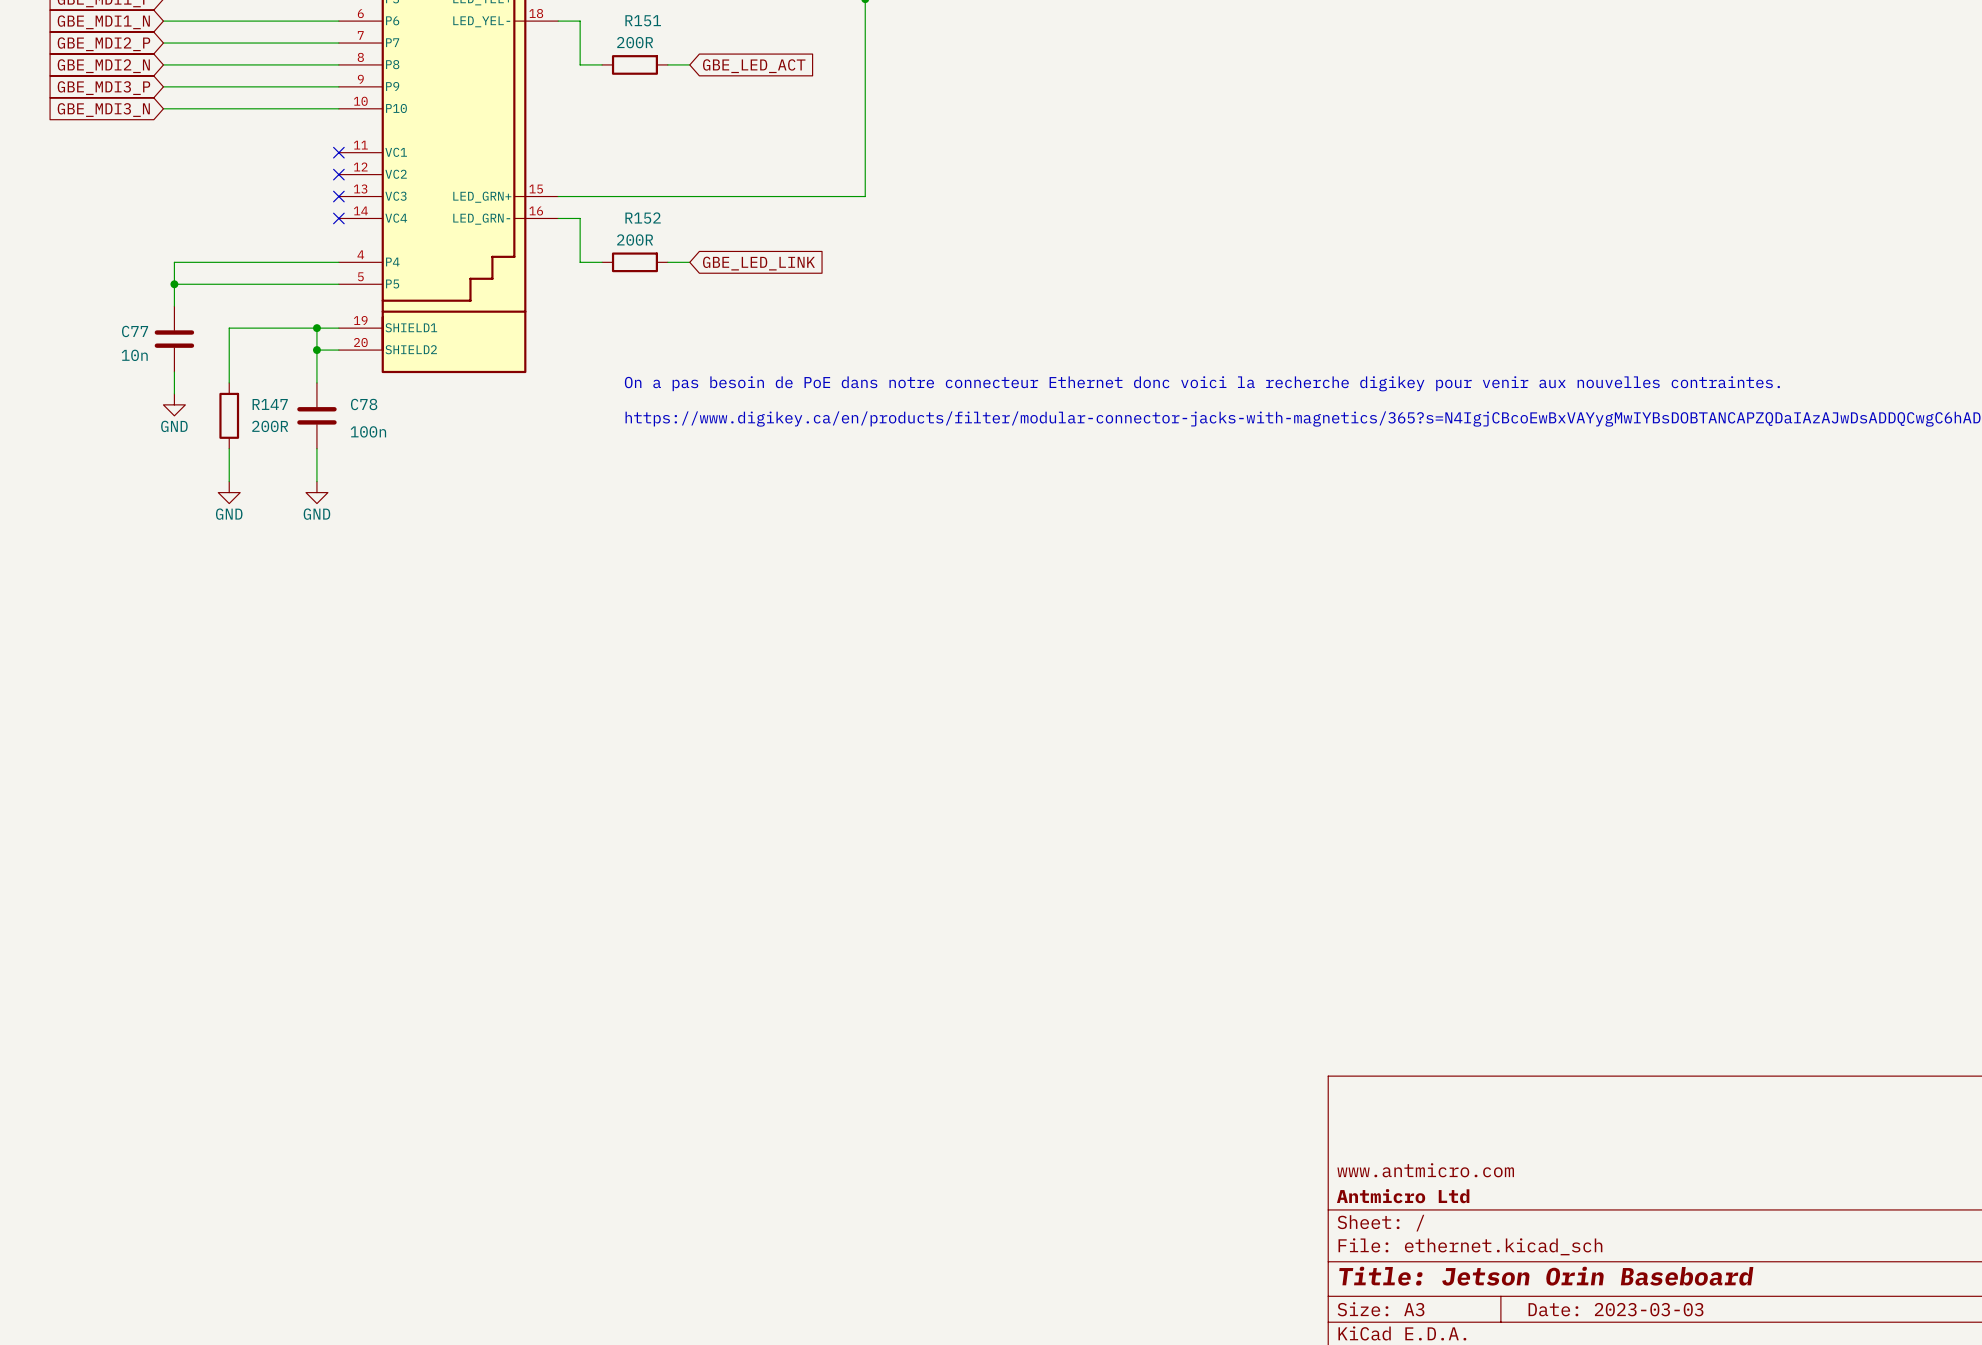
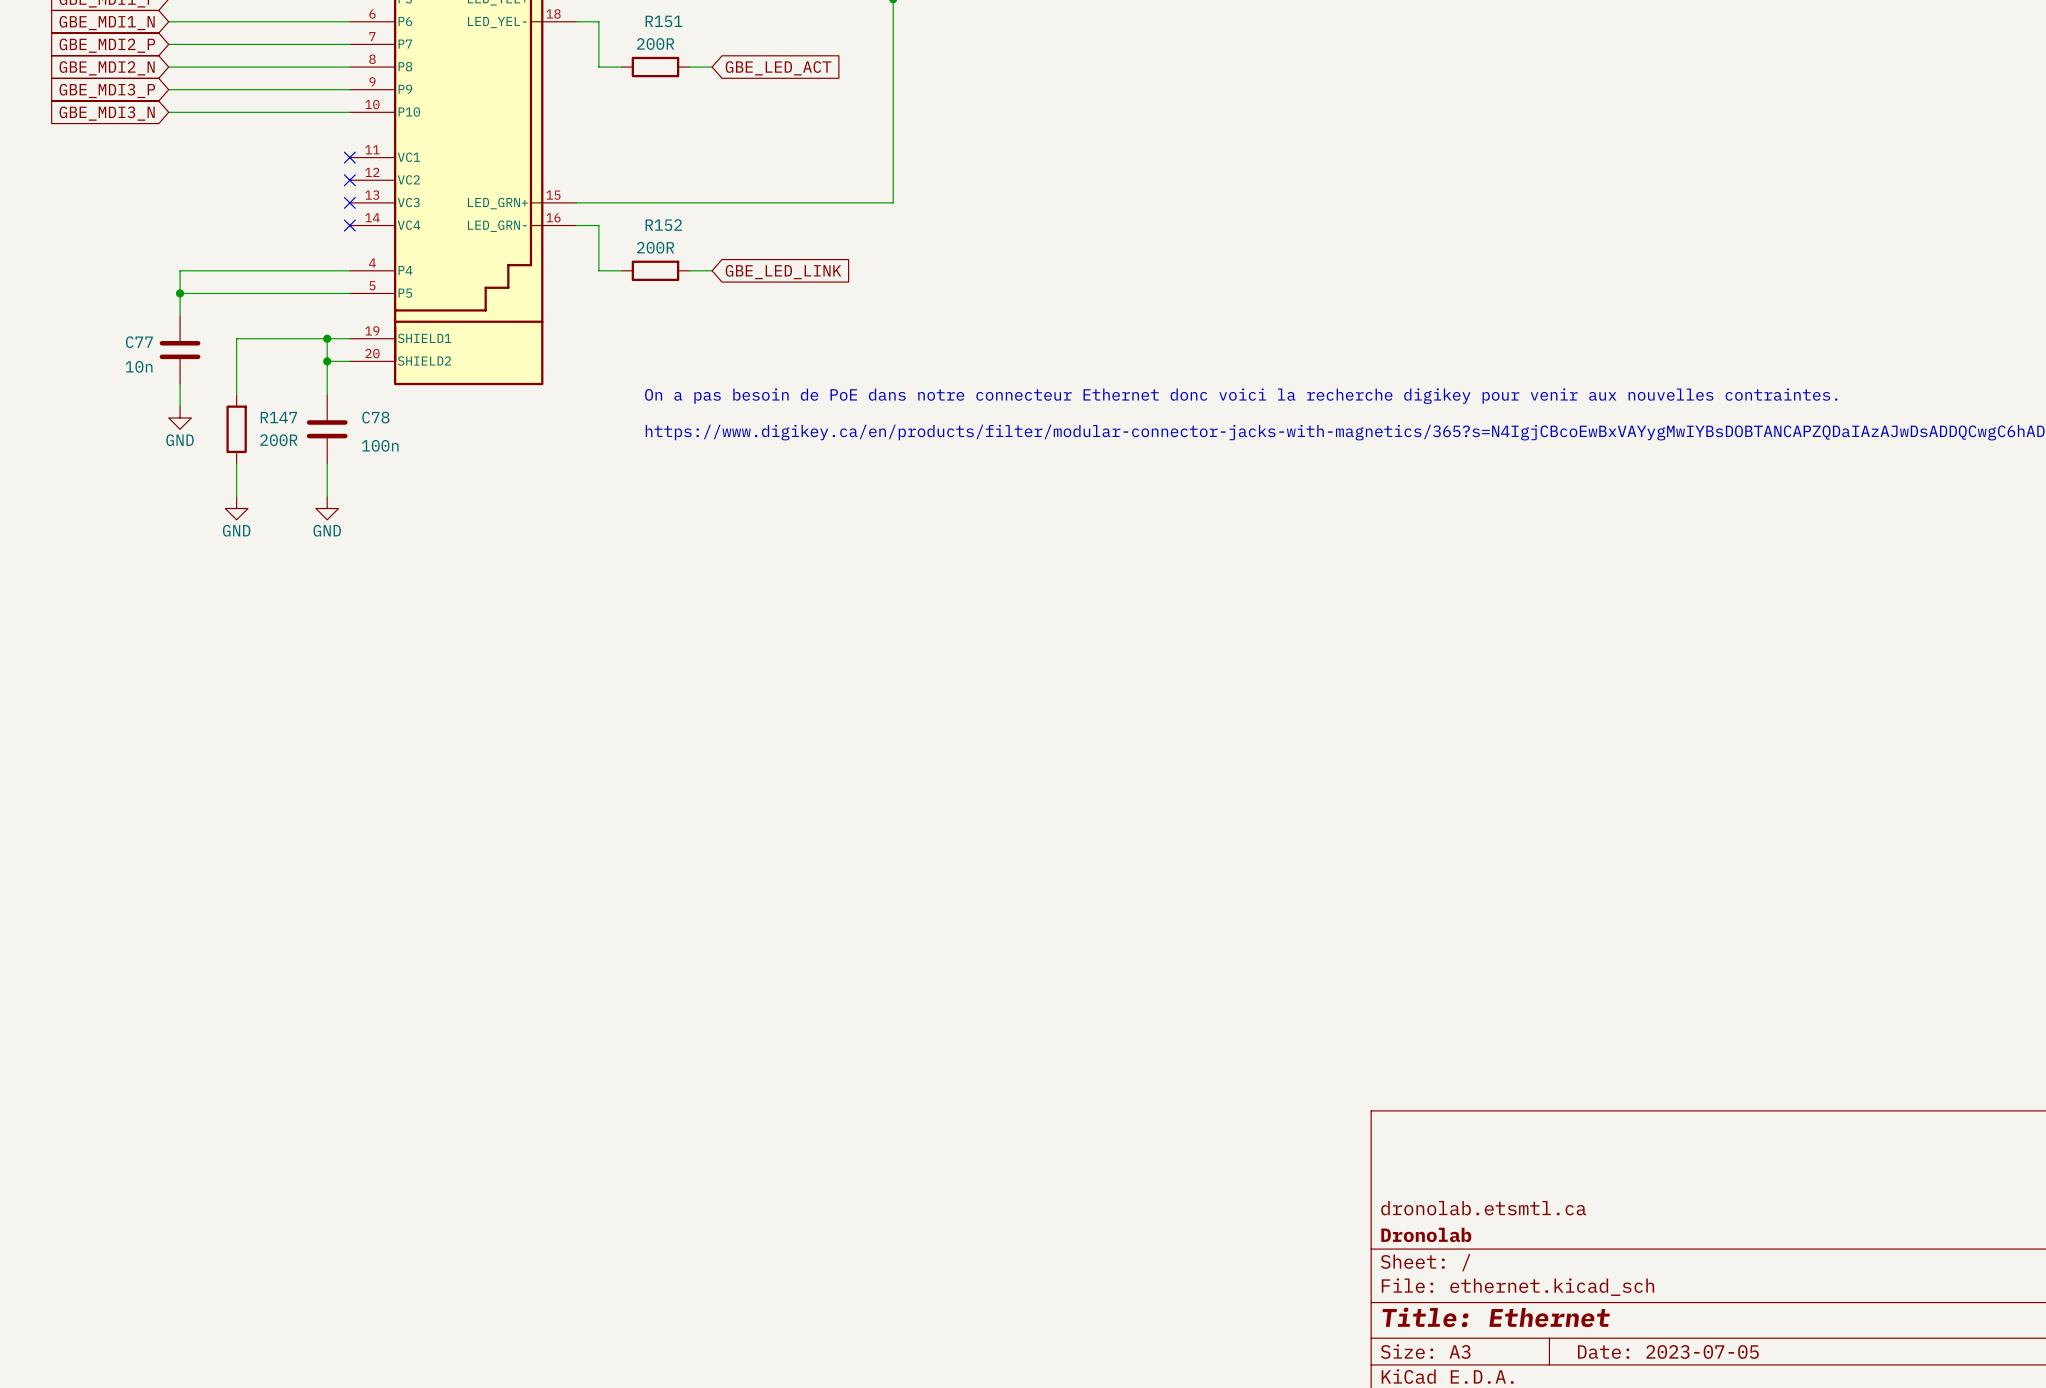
title block: www.antmicro.com (1425, 1170) -> dronolab.etsmtl.ca (1483, 1208)
title block: Antmicro Ltd (1403, 1196) -> Dronolab (1426, 1234)
title block: Title: Jetson Orin Baseboard (1546, 1276) -> Title: Ethernet (1496, 1317)
title block: Date: 2023-03-03 (1616, 1309) -> Date: 2023-07-05 (1668, 1351)

